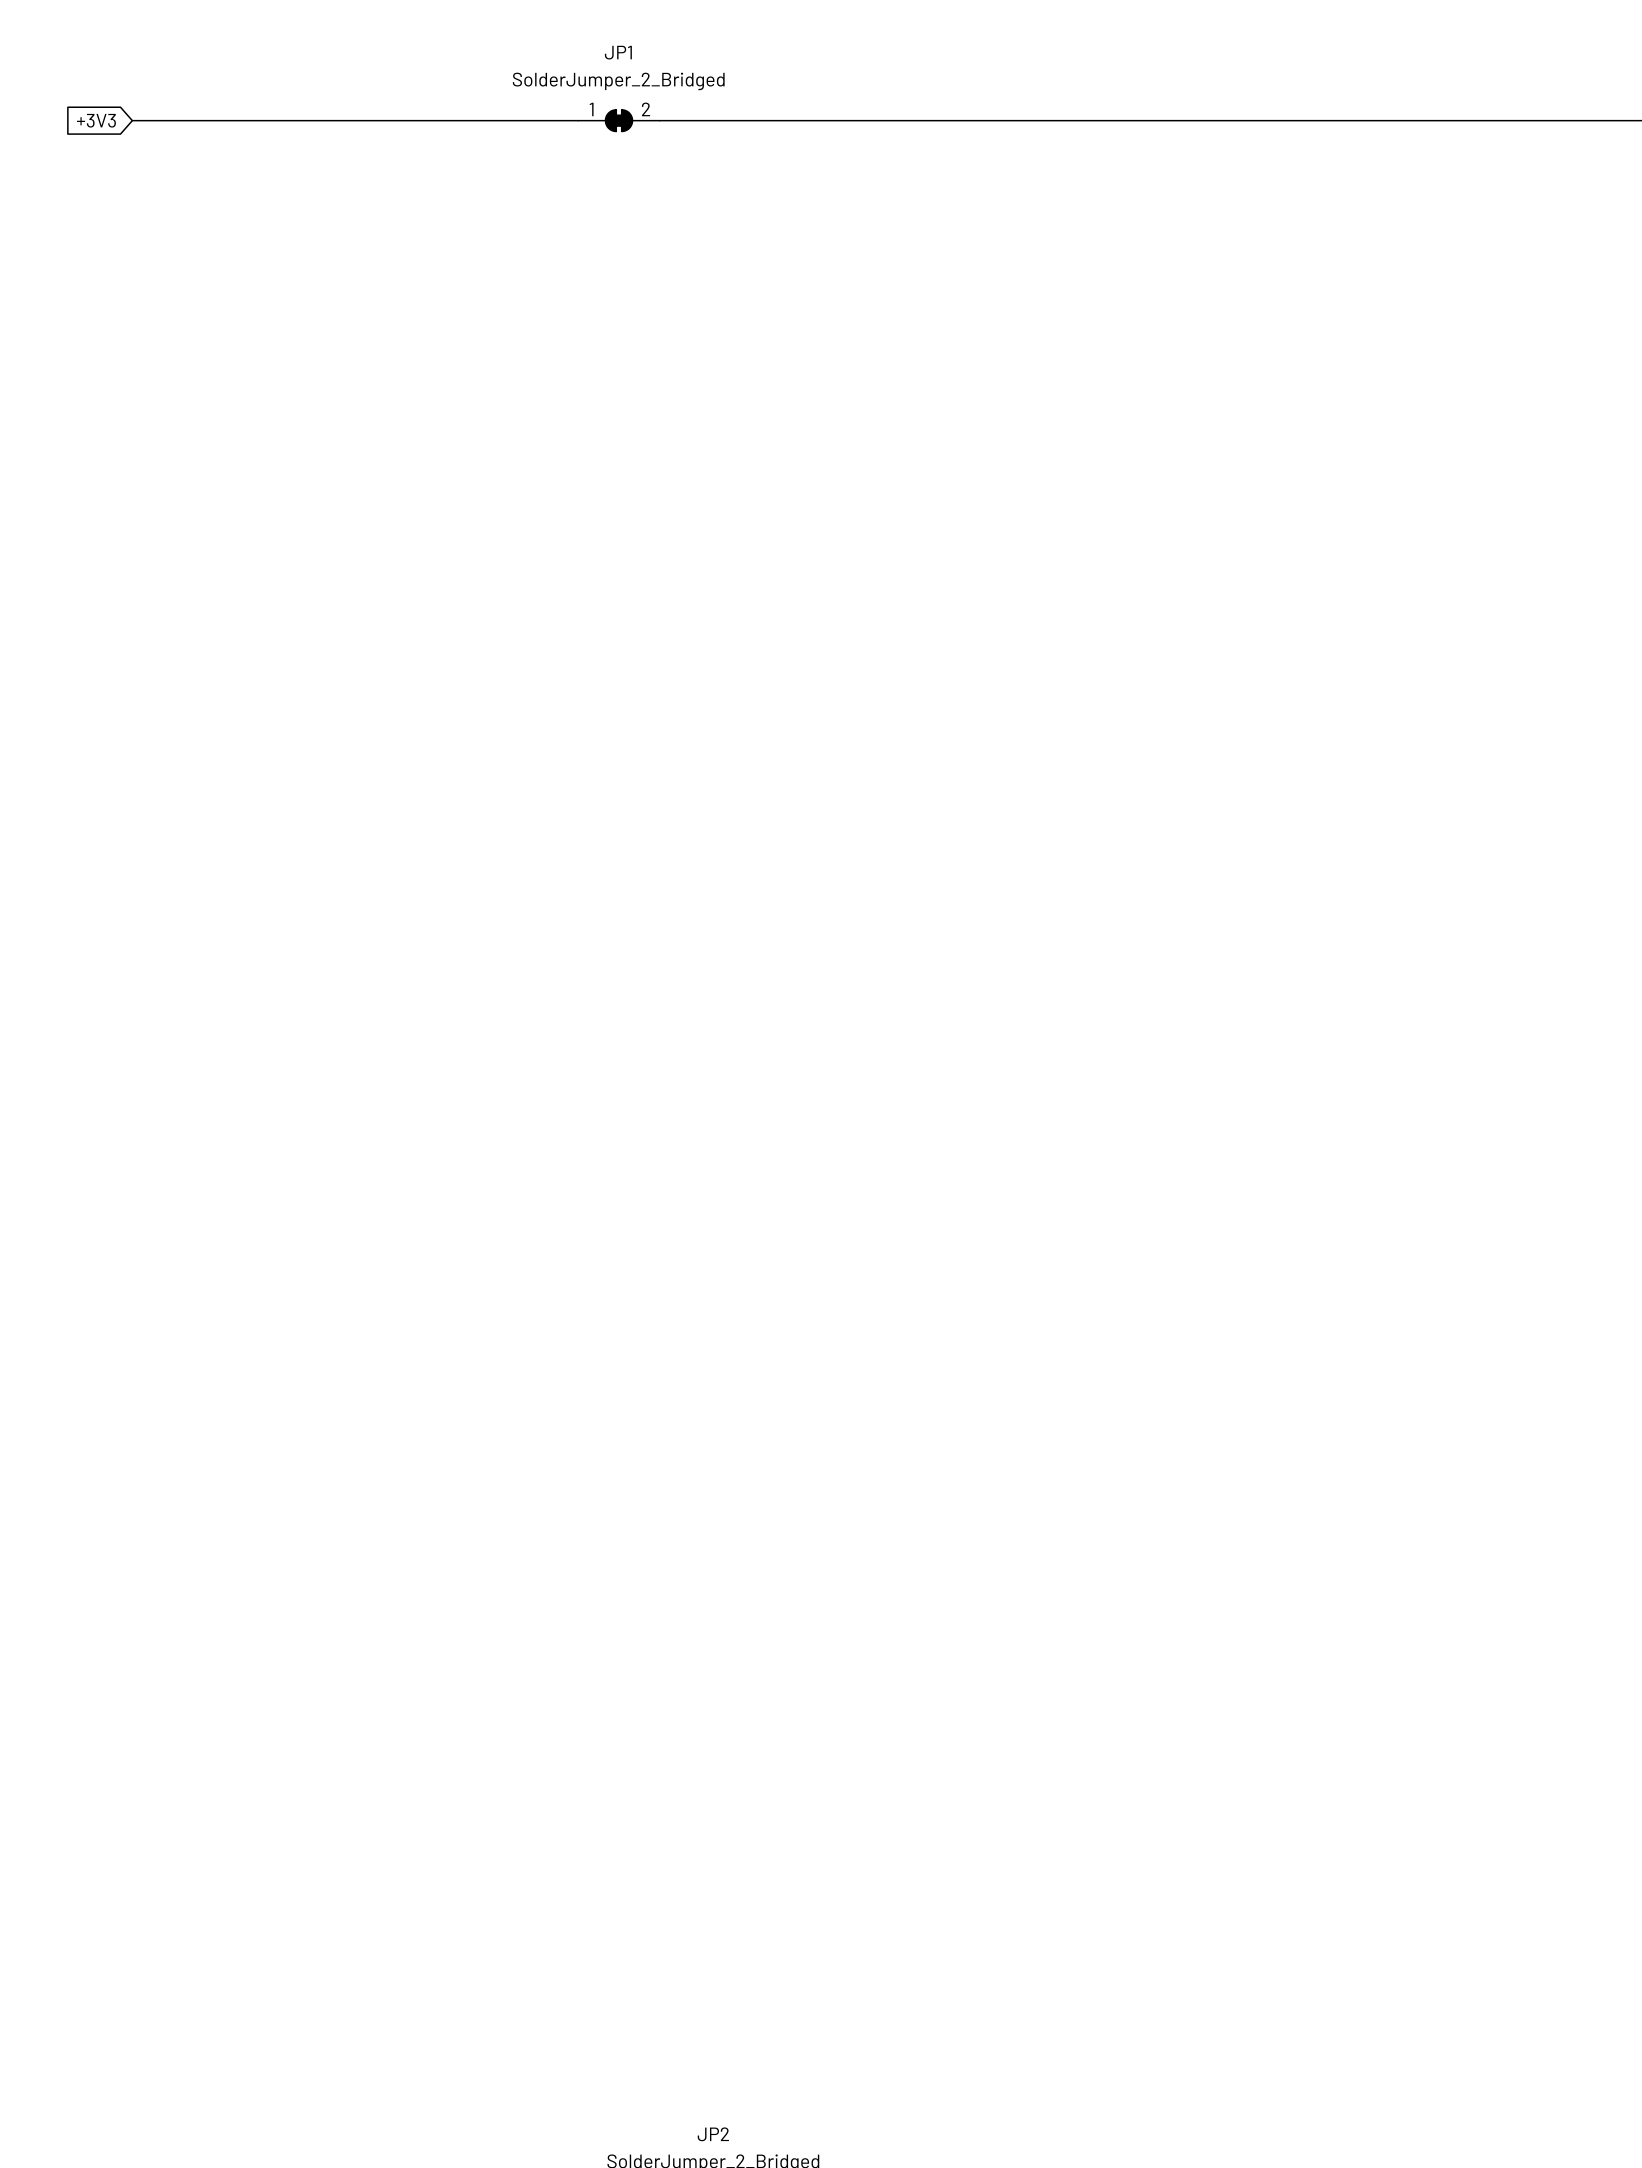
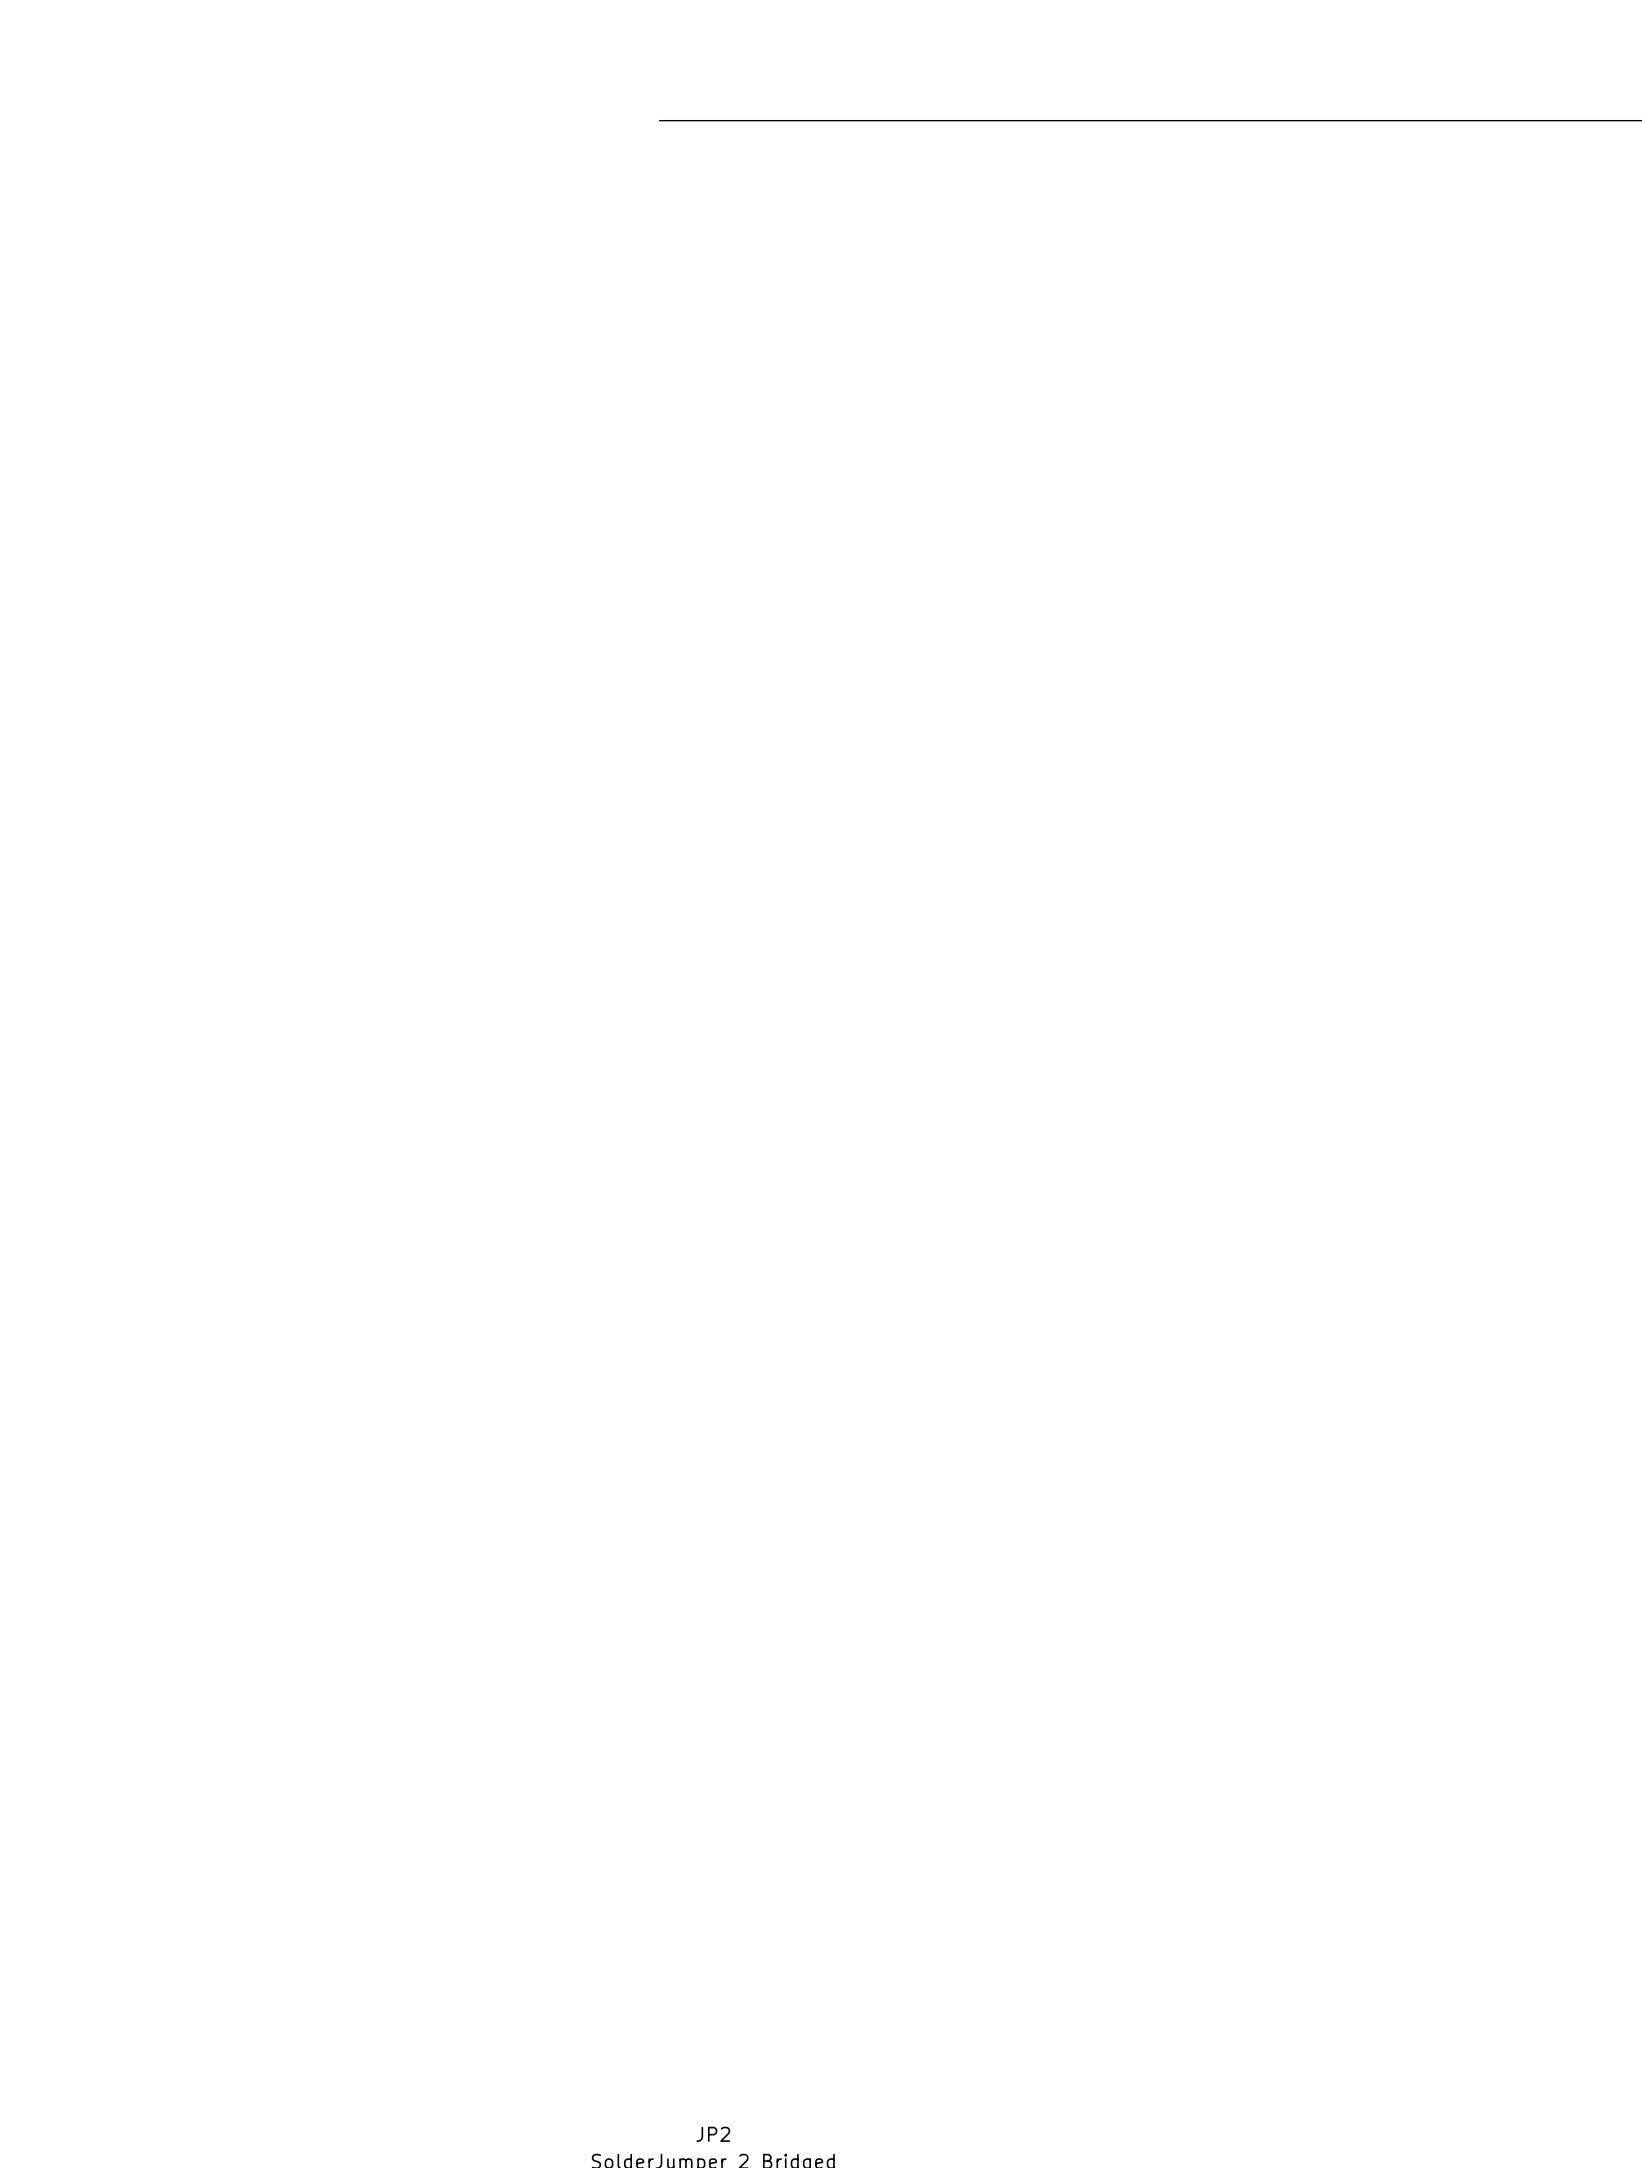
global label: +3V3 (96, 120) -> none
wire: (132, 120) (578, 120) -> none
JP1: SolderJumper_2_Bridged (618, 120) -> none

